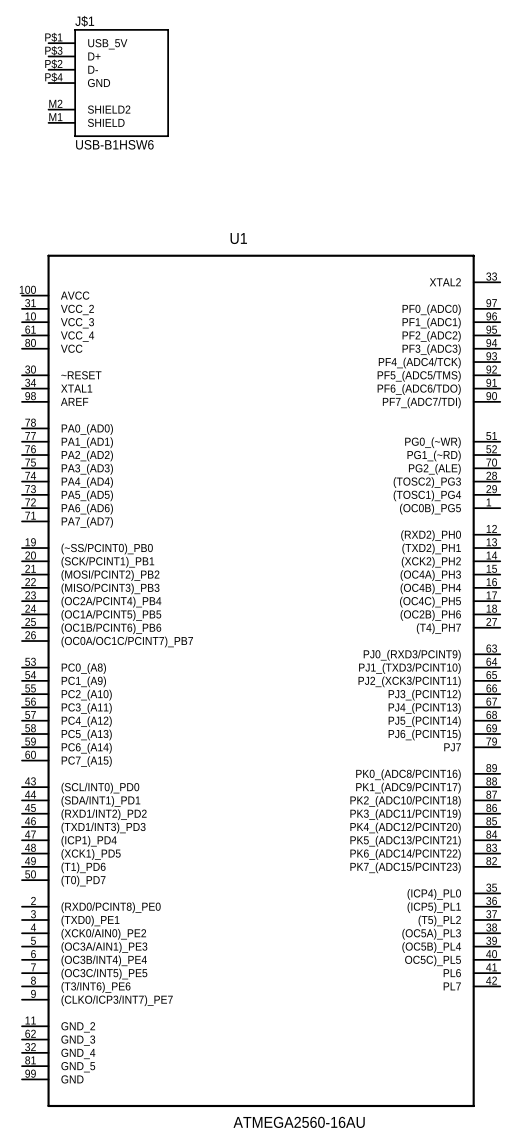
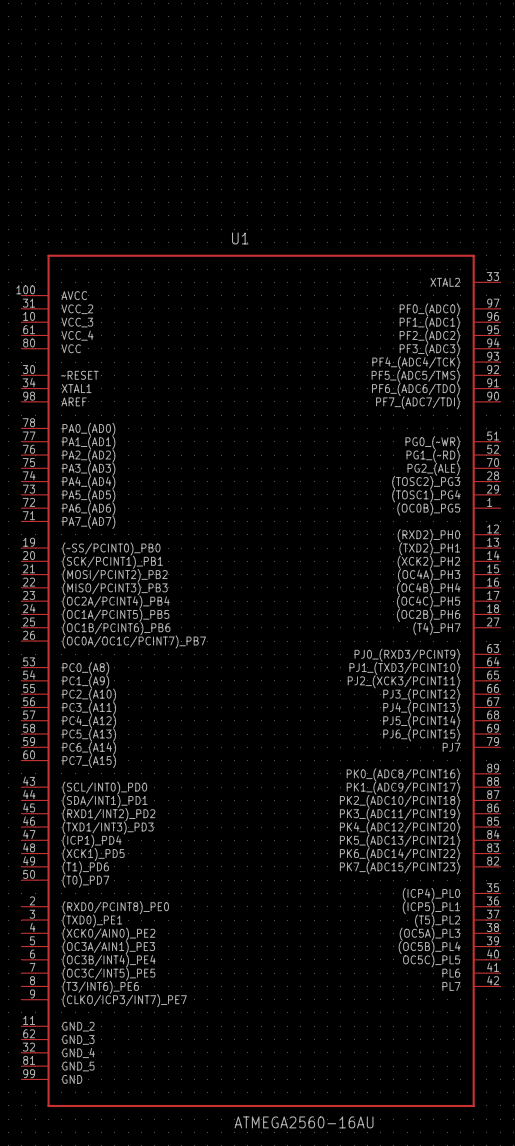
J$1: USB-B1HSW6 (108, 83) -> none

